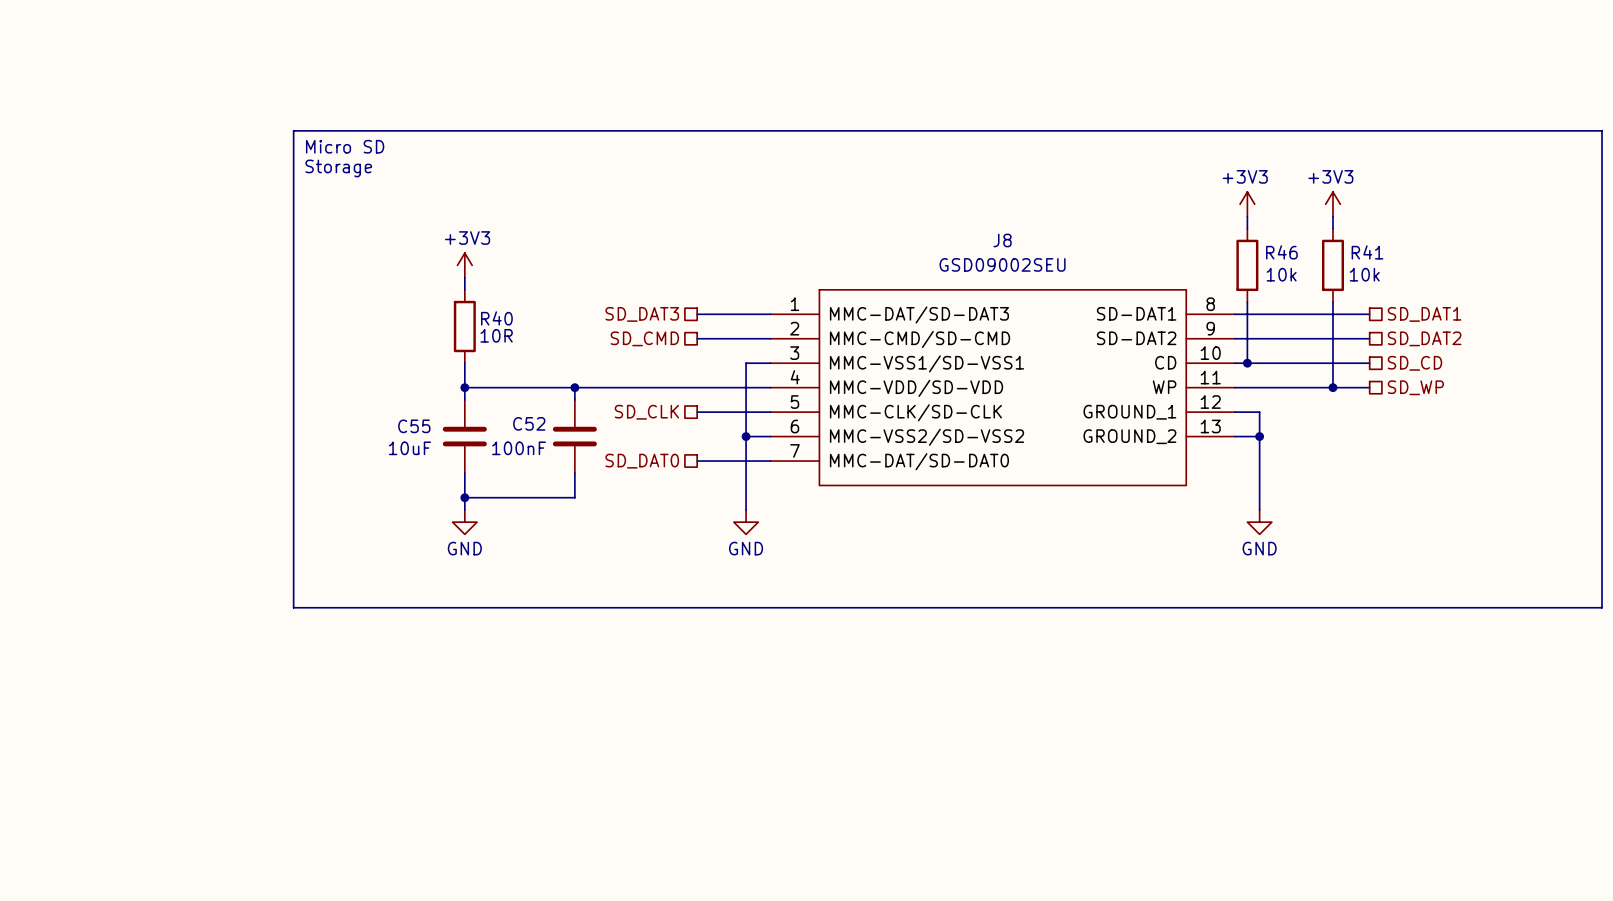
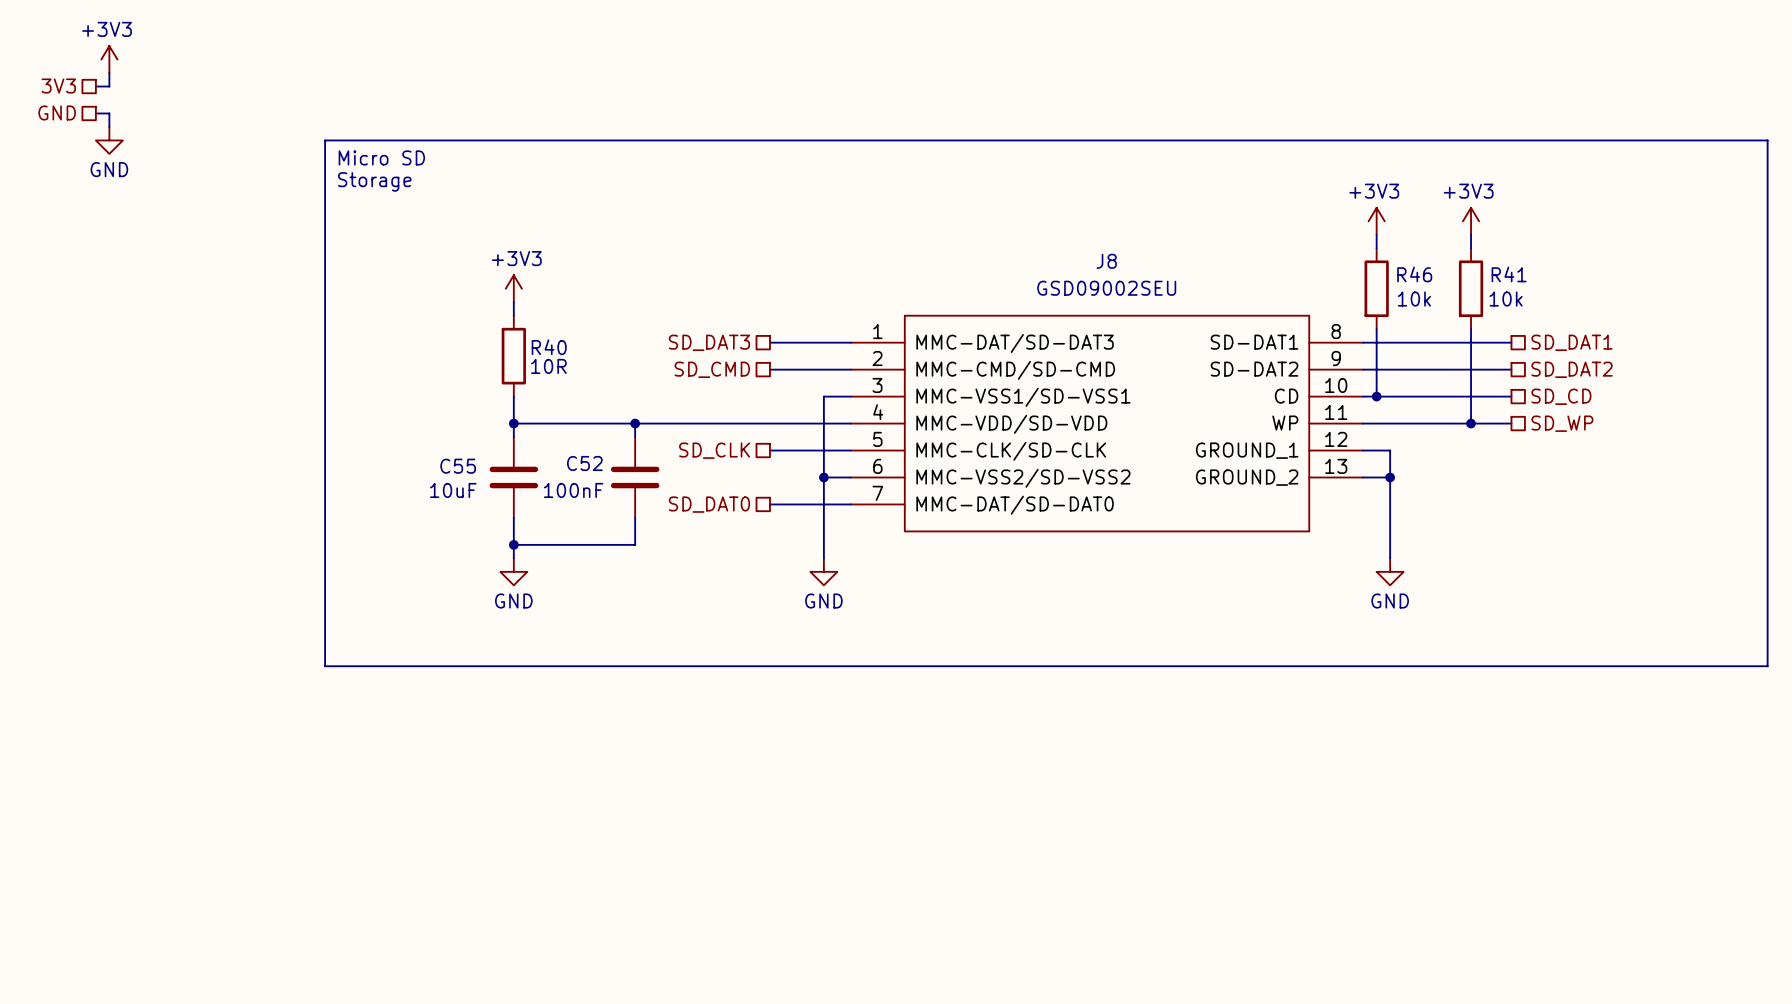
power symbol: none -> +3V3 (109, 59)
wire: none -> (109, 73) (109, 86) (95, 86)
hierarchical label: none -> 3V3 (58, 86)
hierarchical label: none -> GND (57, 112)
wire: none -> (95, 113) (109, 113) (109, 126)
power symbol: none -> GND (109, 140)

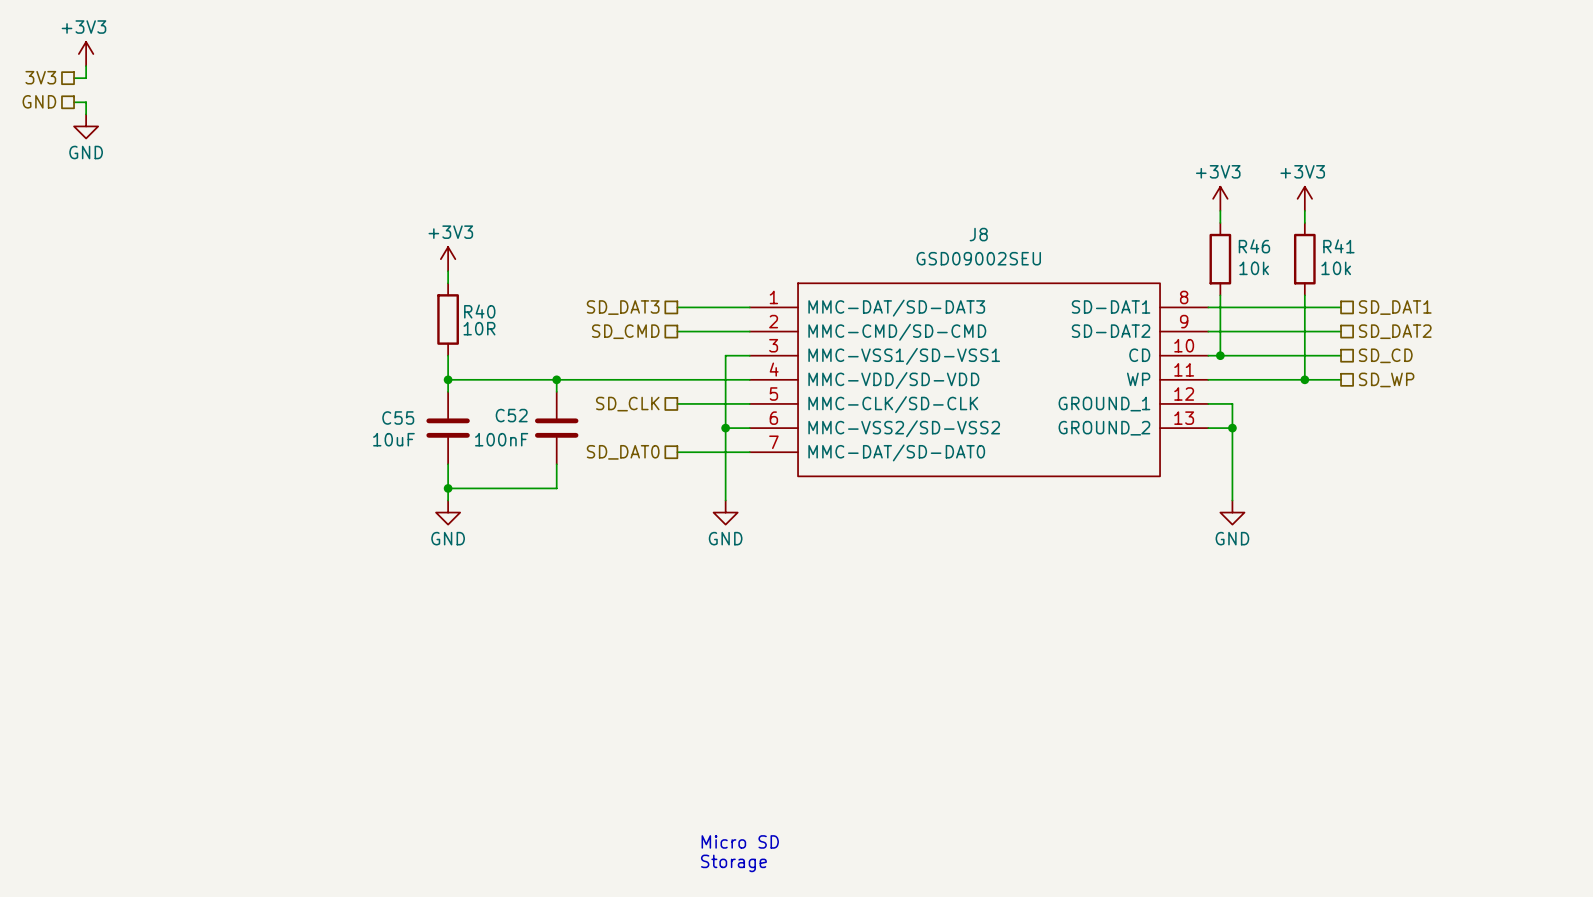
line: (325, 140) (1767, 140) (1767, 666) (325, 666) (325, 140) -> none
text: Micro SD (381, 157) -> none
text: Storage (374, 181) -> none
text: none -> Micro SD (740, 841)
text: none -> Storage (733, 863)

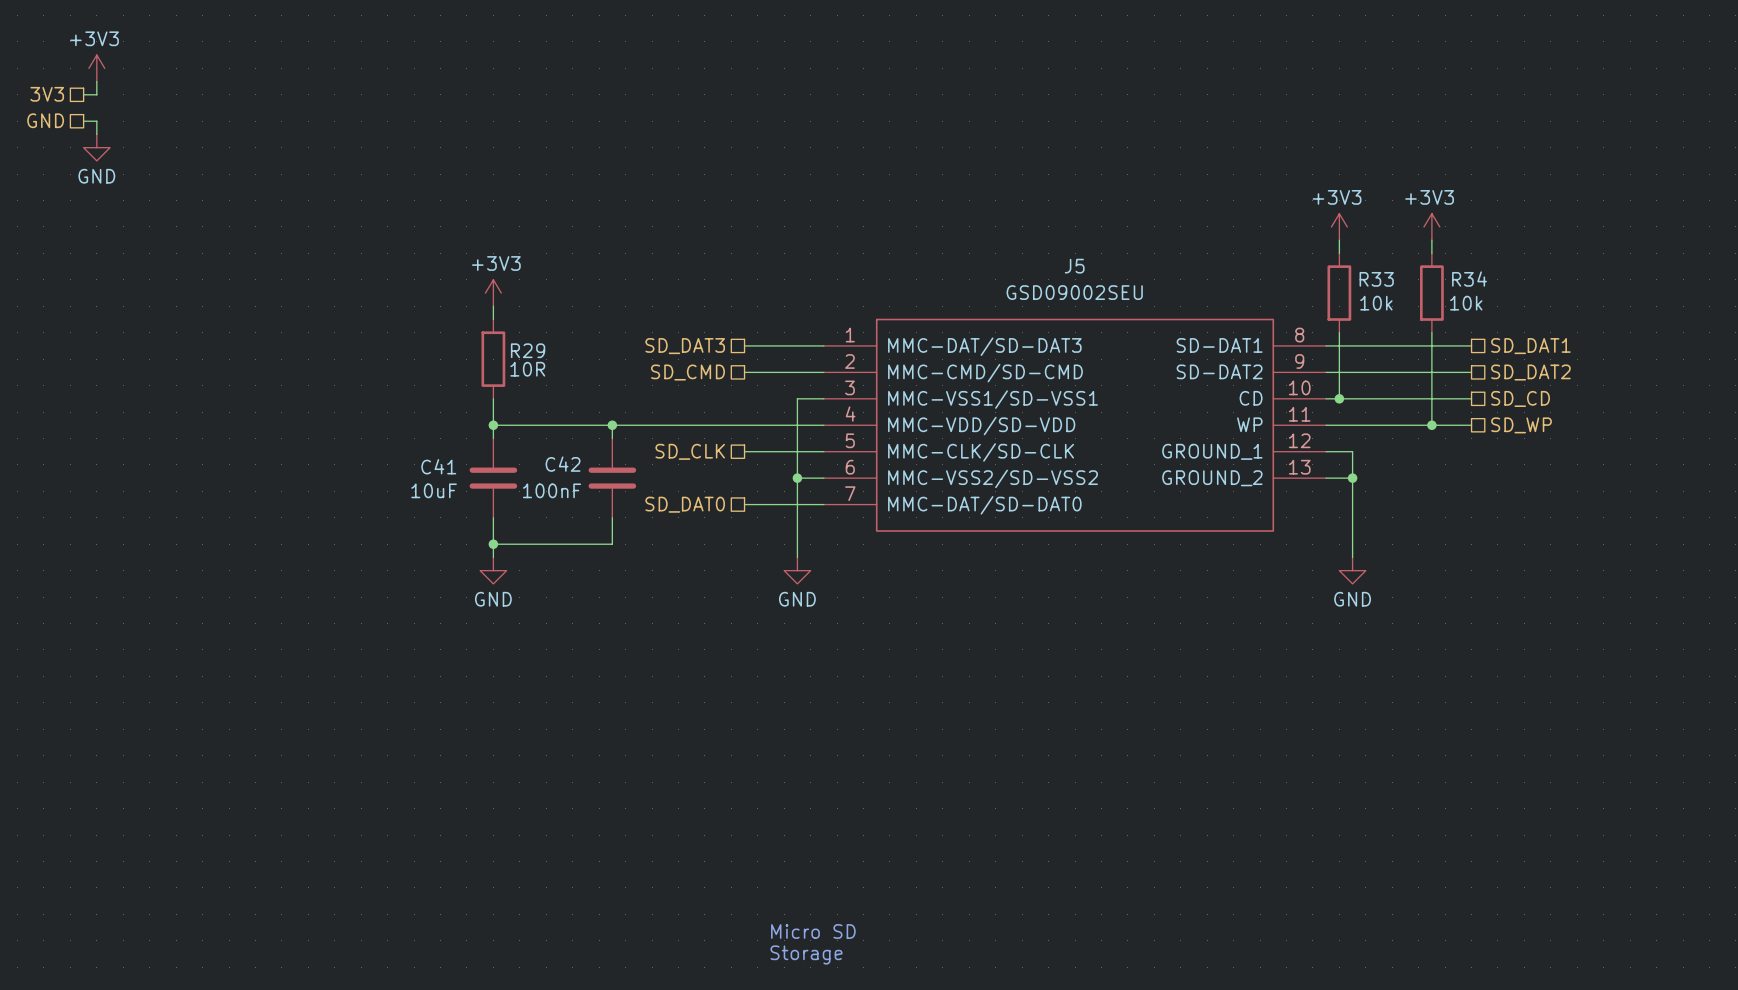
J8 name: J8 (978, 234) -> J5 (1074, 266)
R46 name: R46 (1254, 246) -> R33 (1376, 279)
R41 name: R41 (1338, 246) -> R34 (1469, 279)
R40 name: R40 (479, 311) -> R29 (528, 350)
C52 name: C52 (511, 415) -> C42 (563, 464)
C55 name: C55 (398, 417) -> C41 (438, 466)

